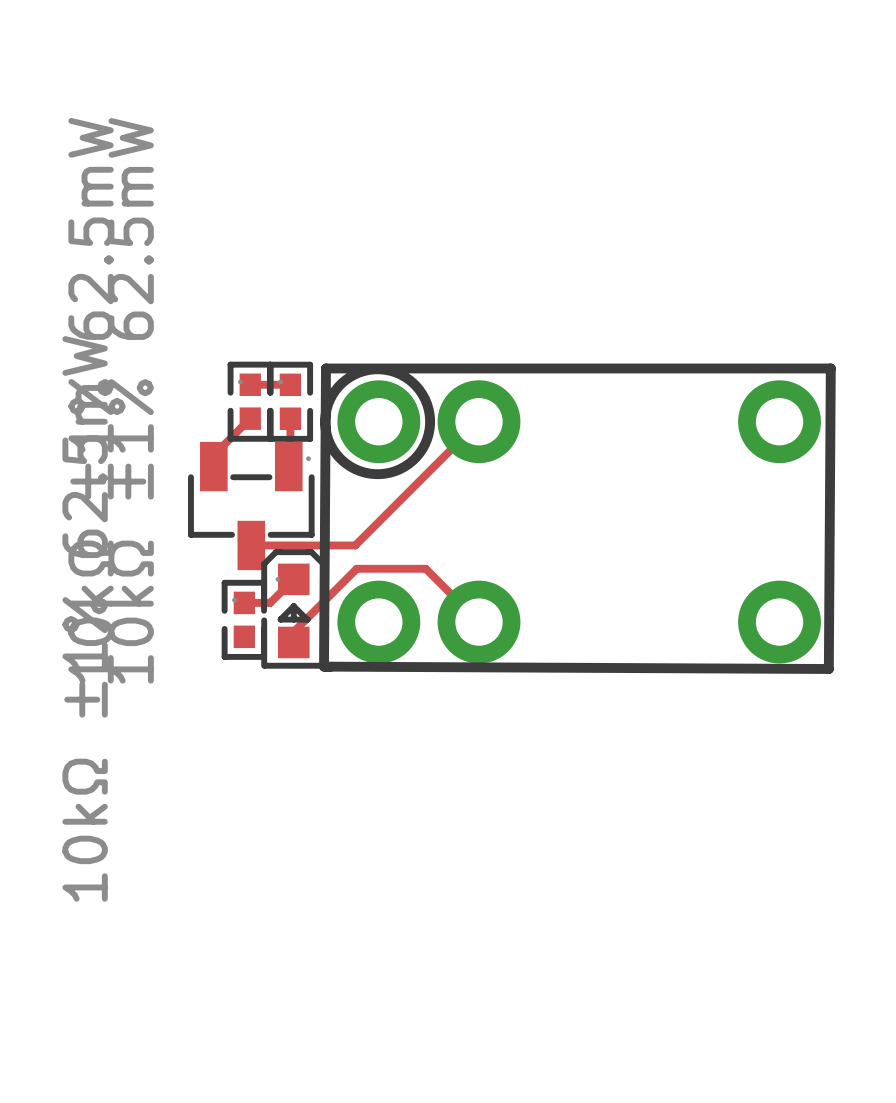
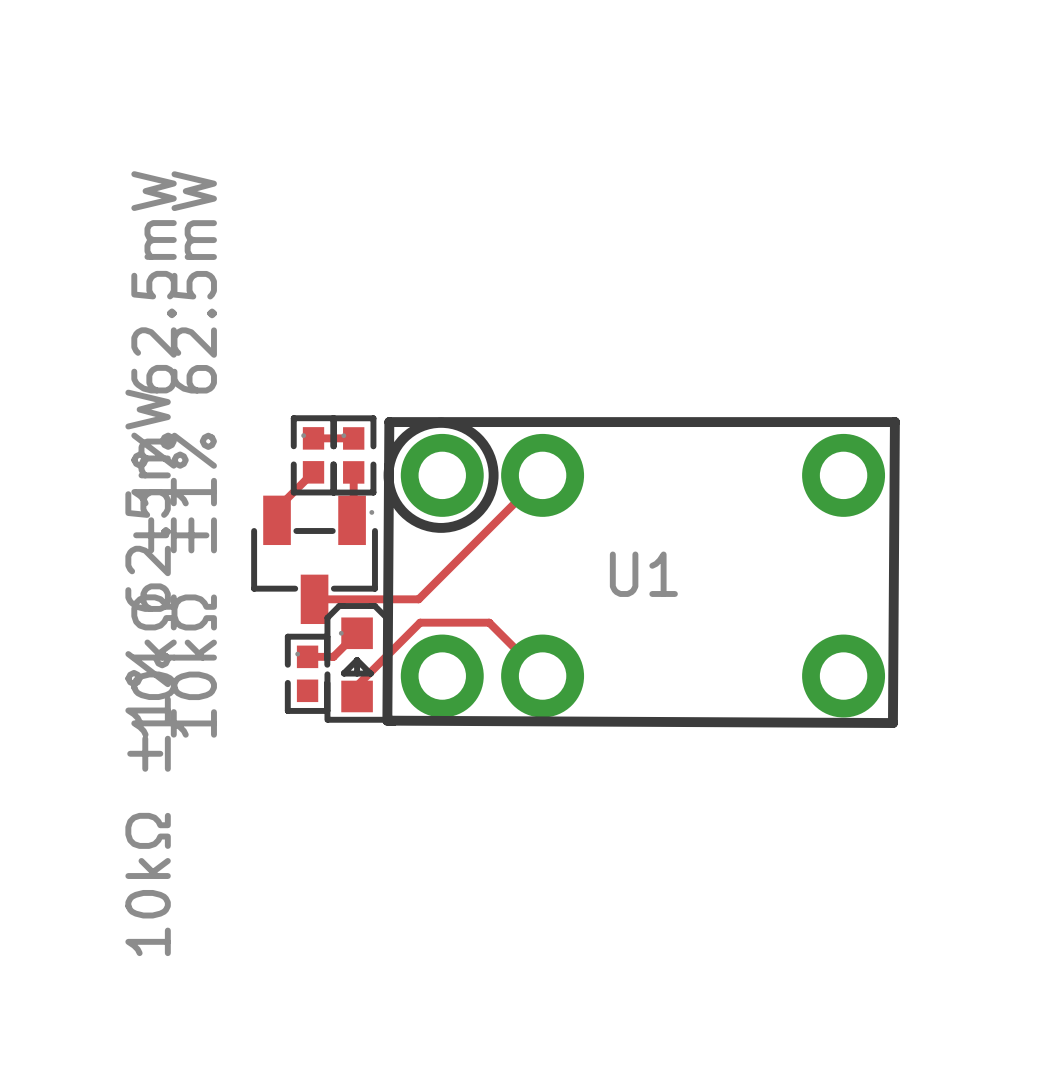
U1 name: none -> U1 (643, 574)

